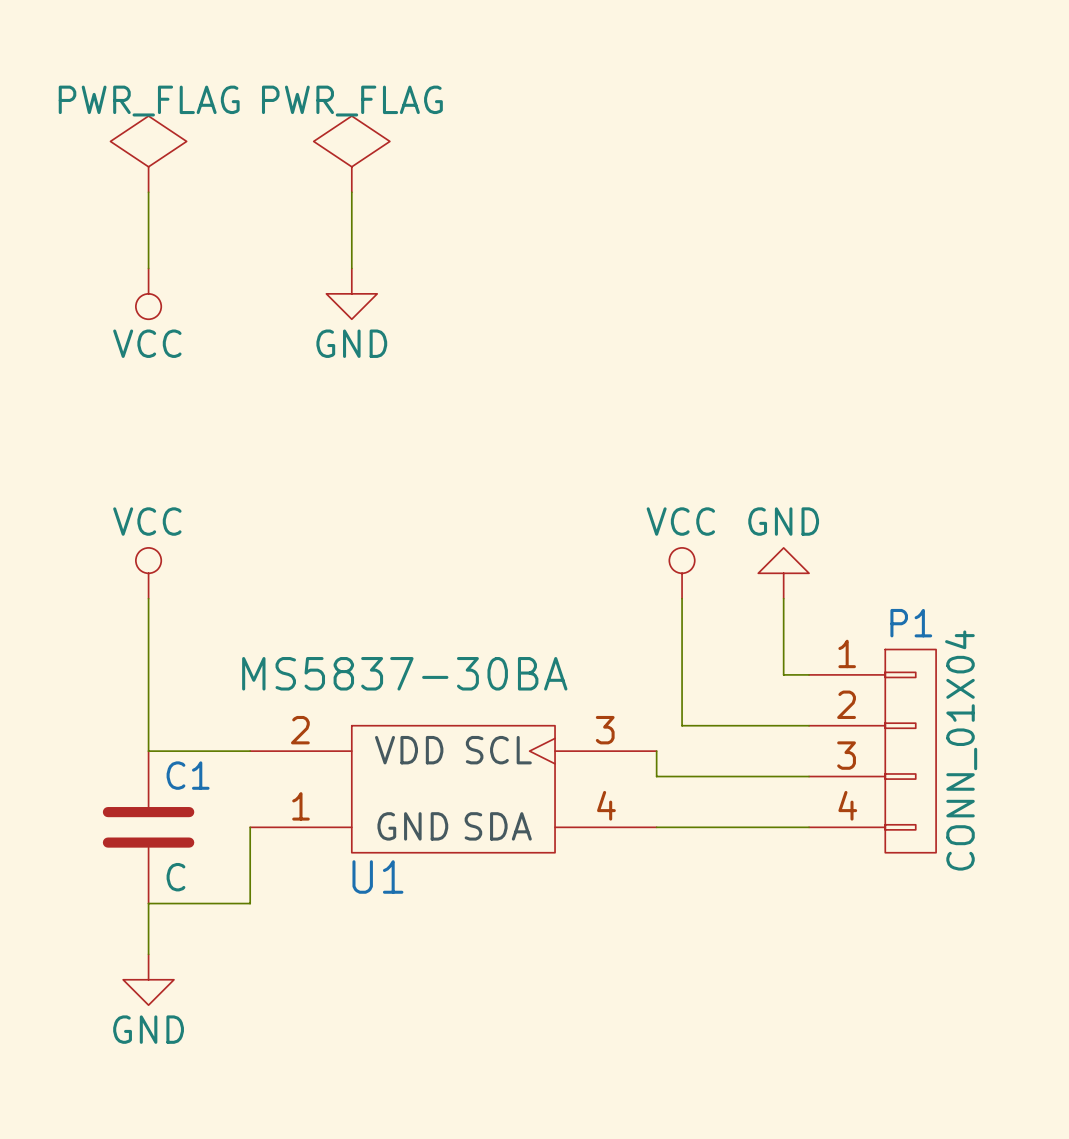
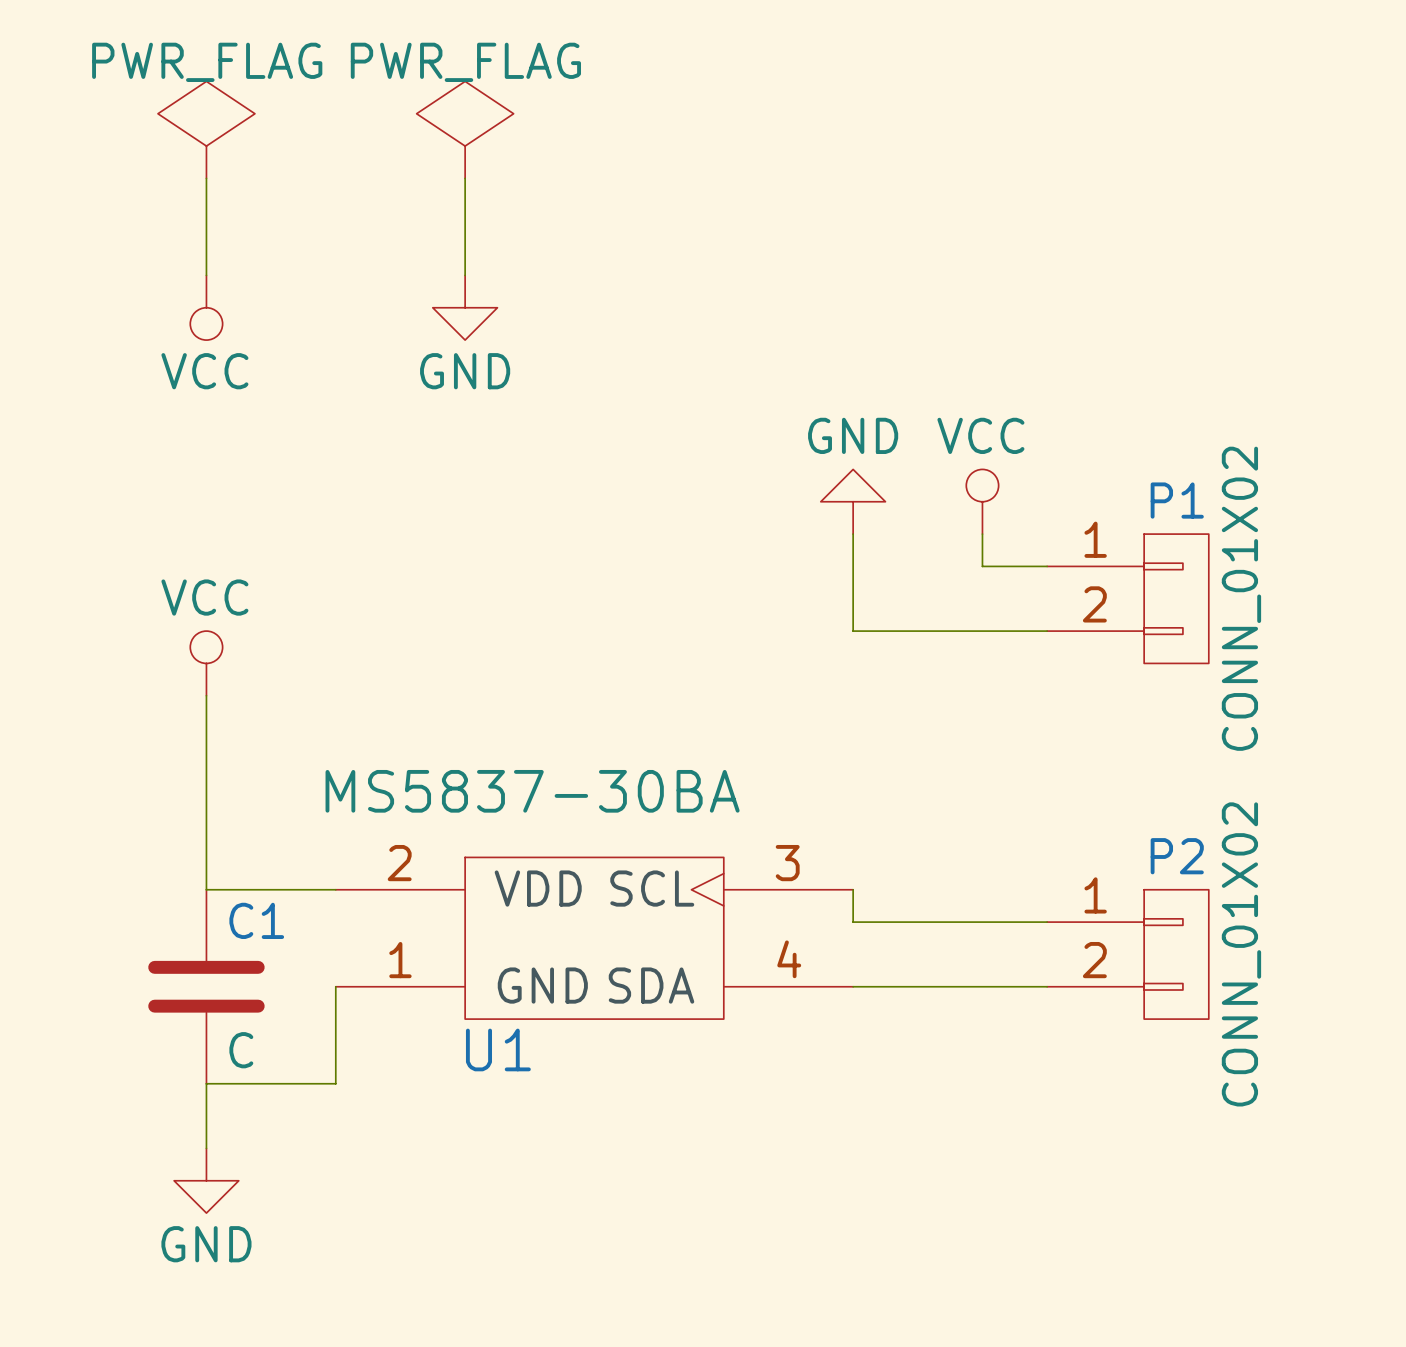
wire: none -> (853, 534) (853, 631) (1047, 631)
wire: none -> (982, 534) (982, 566) (1047, 566)
power symbol position: VCC (682, 573) -> VCC (982, 501)
power symbol position: GND (783, 573) -> GND (853, 501)
wire: (682, 598) (682, 725) (809, 725) -> none
wire: (783, 598) (783, 674) (809, 674) -> none
P1 name position: P1 (911, 623) -> P1 (1177, 500)
P1 symbol: [809, 649, 937, 853] -> [1047, 534, 1209, 664]
P1 value: CONN_01X04 (961, 750) -> CONN_01X02 (1241, 598)
P2: none -> CONN_01X02 (1127, 954)

